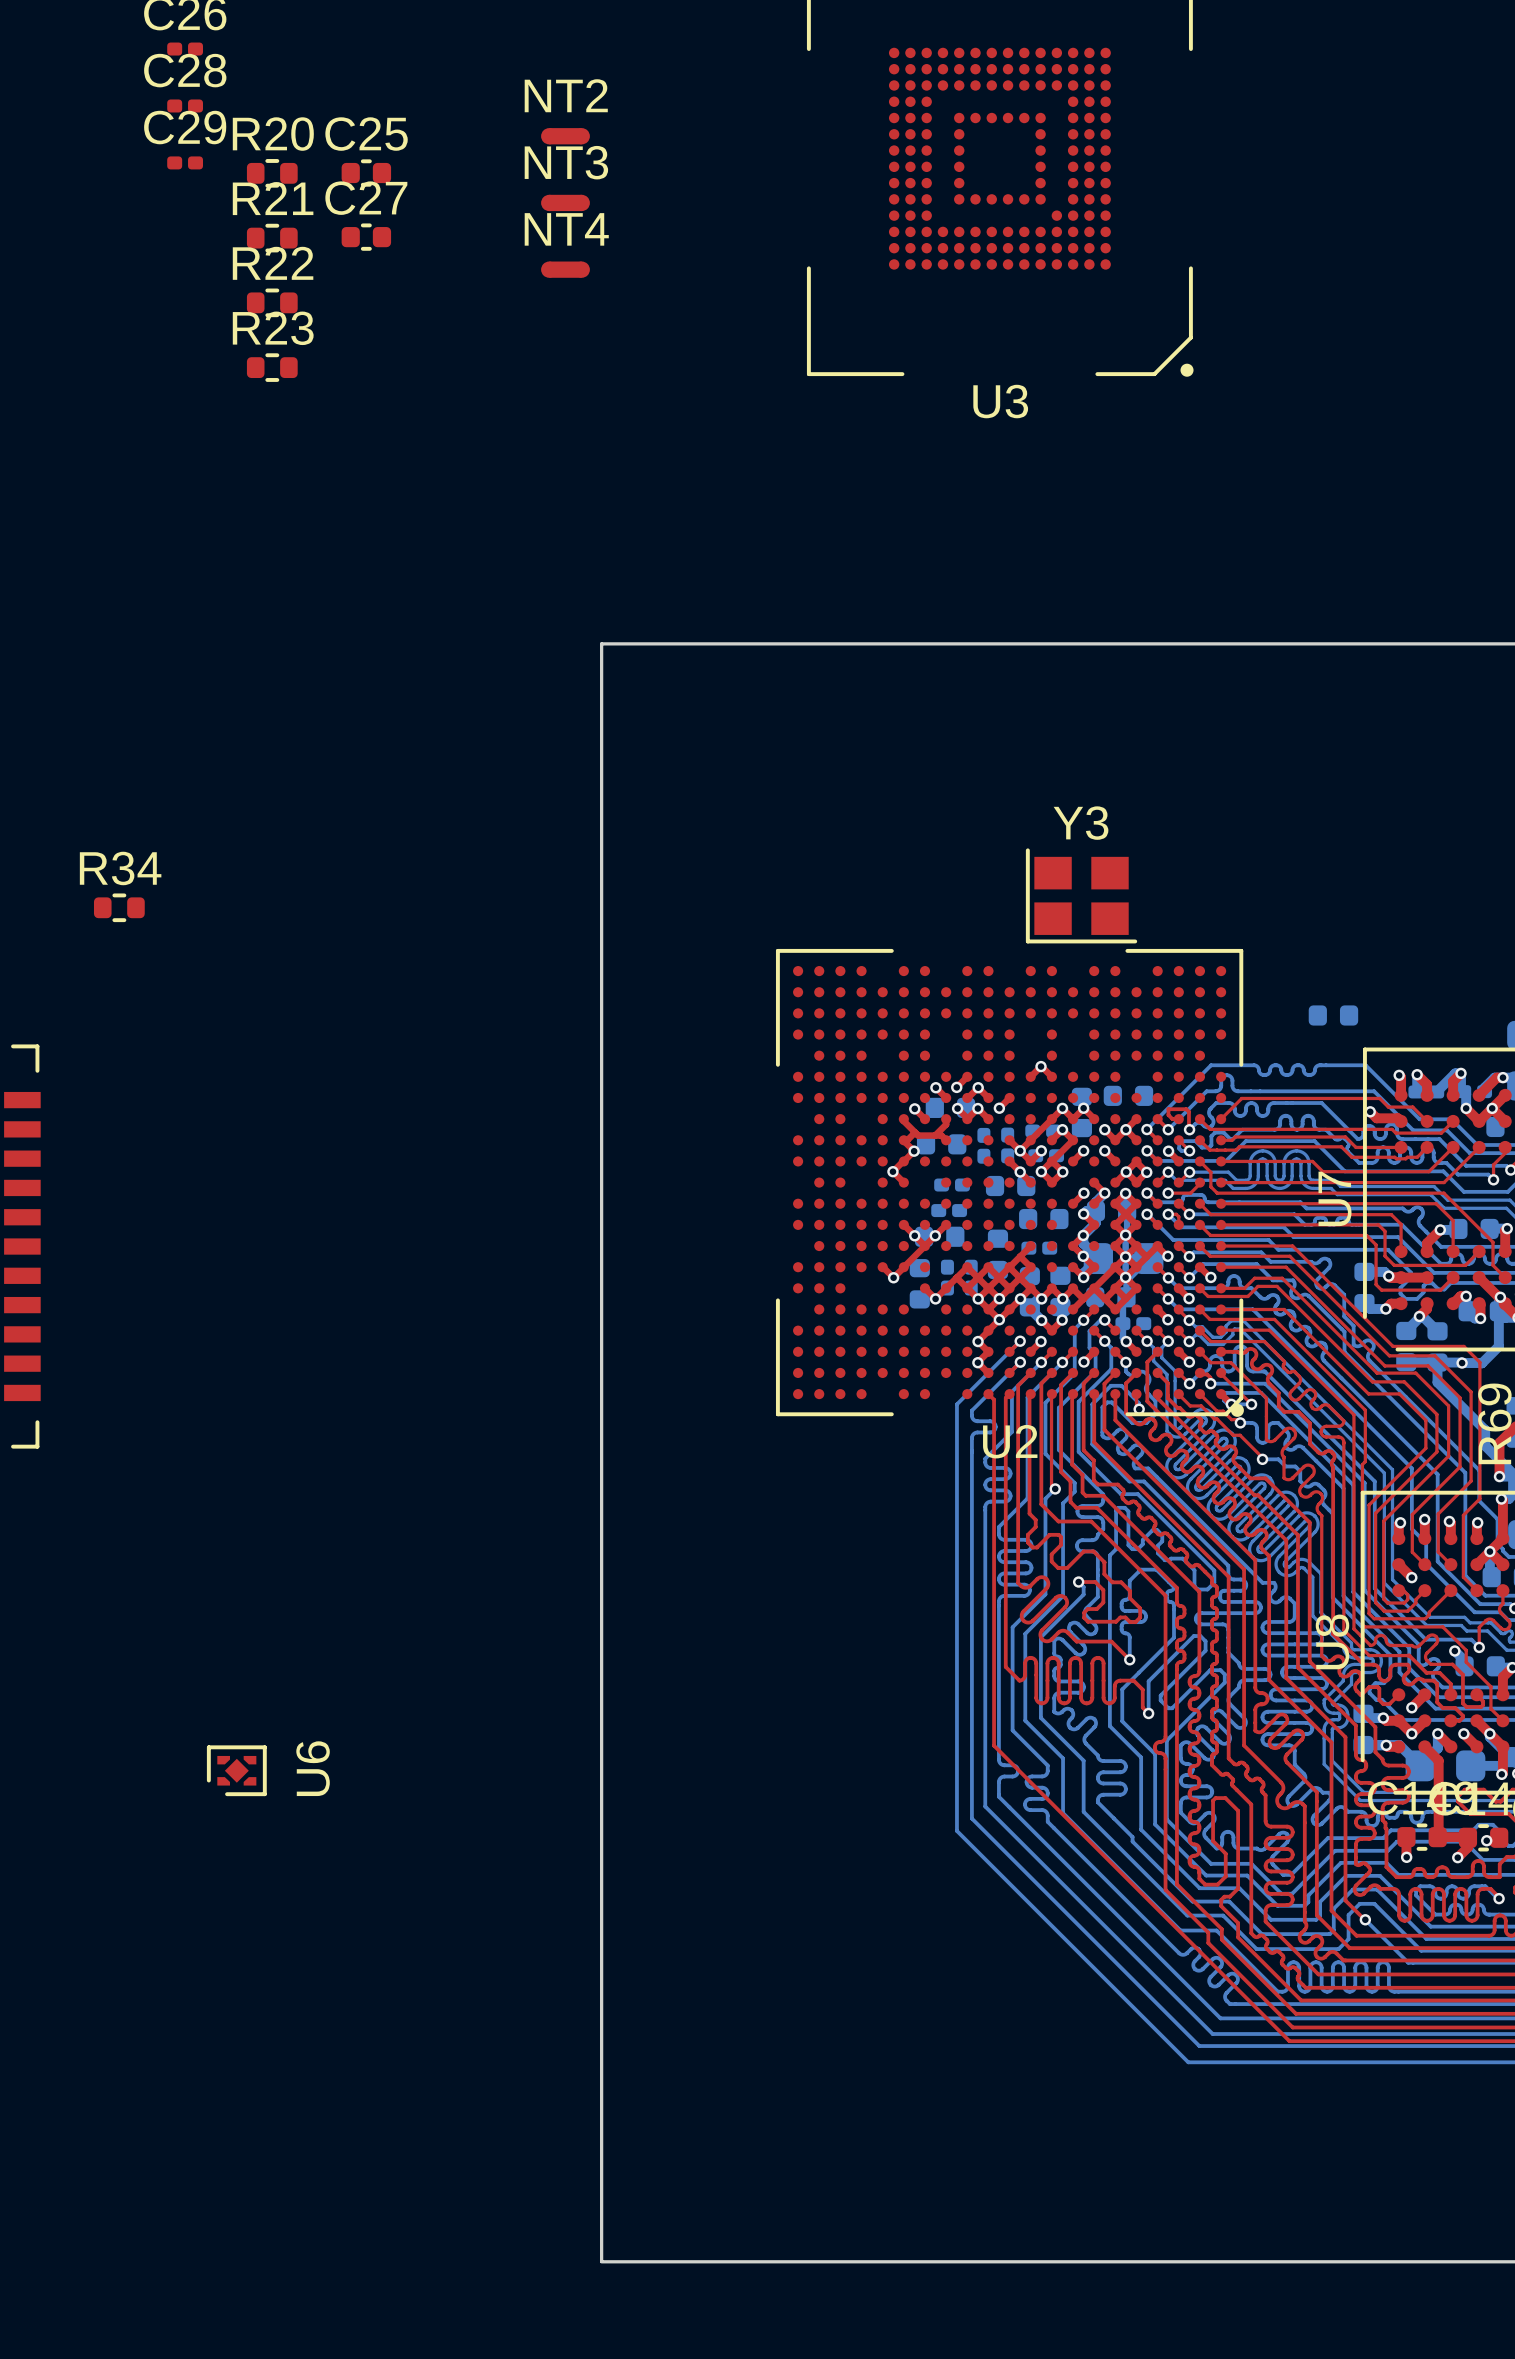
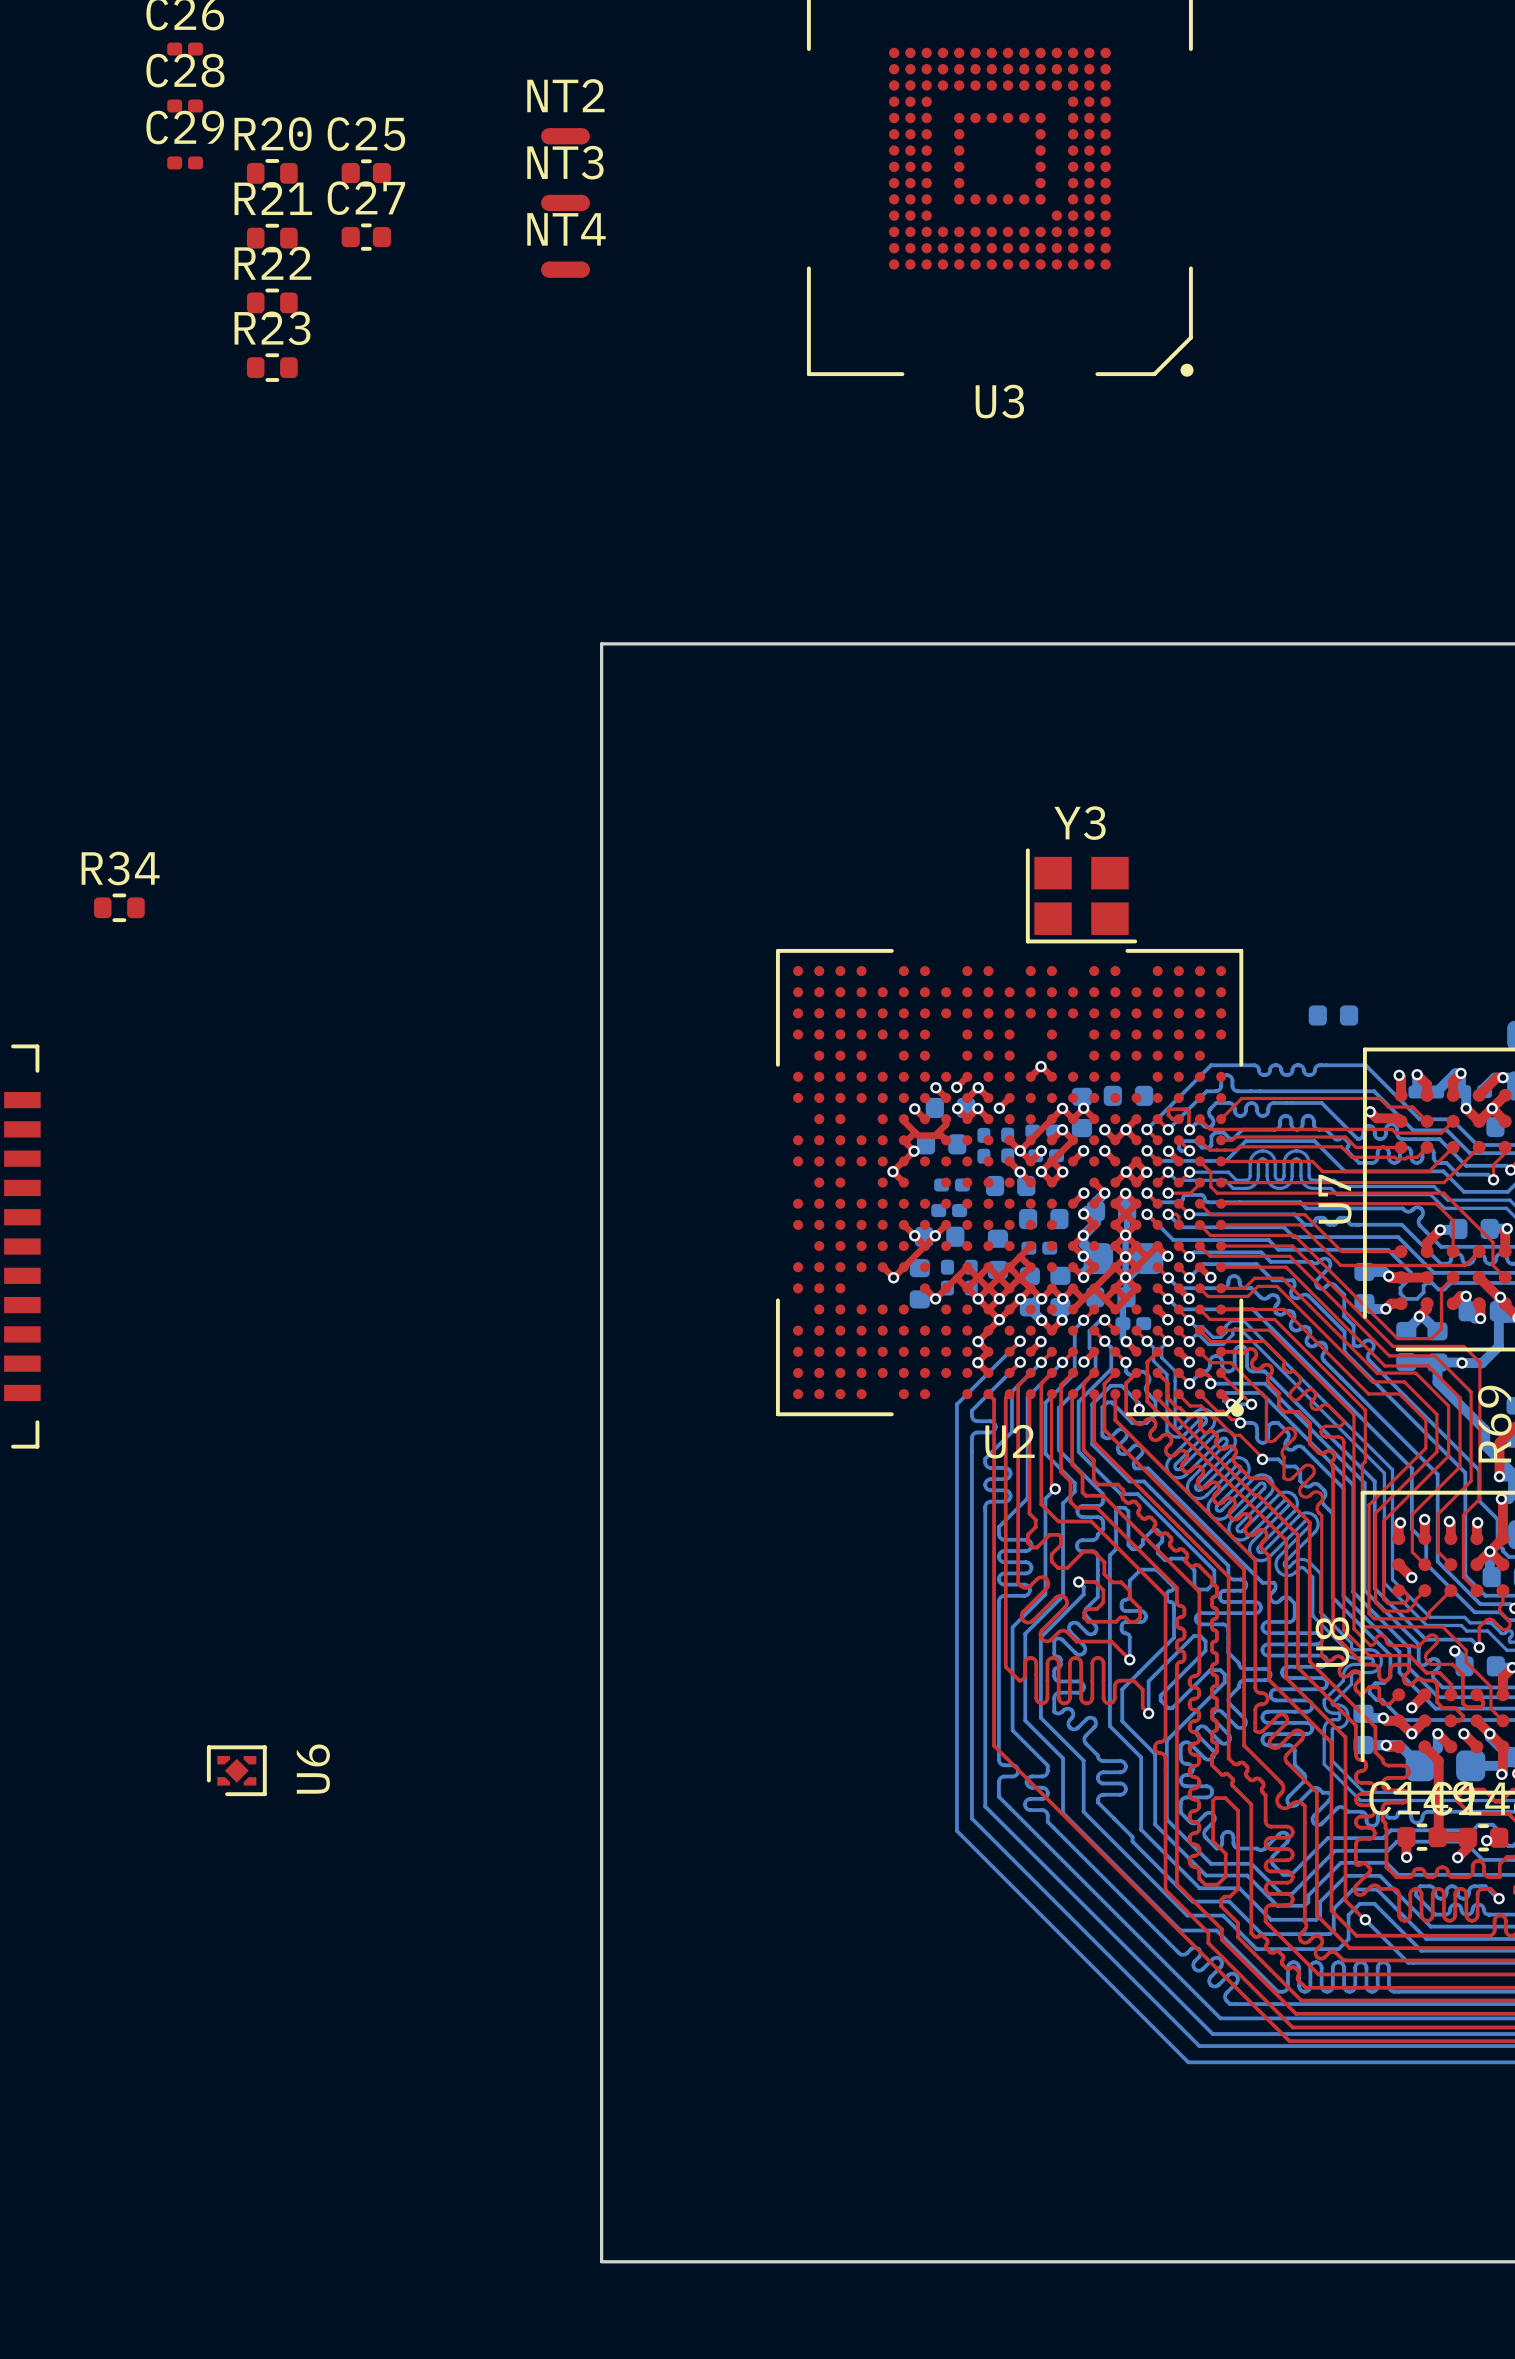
top track: (1304, 1214) (1391, 1214) (1401, 1224) (1401, 1251) -> (1304, 1214) (1341, 1251) (1401, 1251)
top track: (1300, 1224) (1378, 1224) (1385, 1231) (1385, 1256) (1394, 1265) -> (1300, 1224) (1340, 1265) (1394, 1265)
top track: (1294, 1235) (1366, 1235) (1376, 1244) (1376, 1284) (1381, 1290) (1441, 1289) -> (1294, 1235) (1397, 1338) (1431, 1338) (1441, 1328) (1441, 1289)

